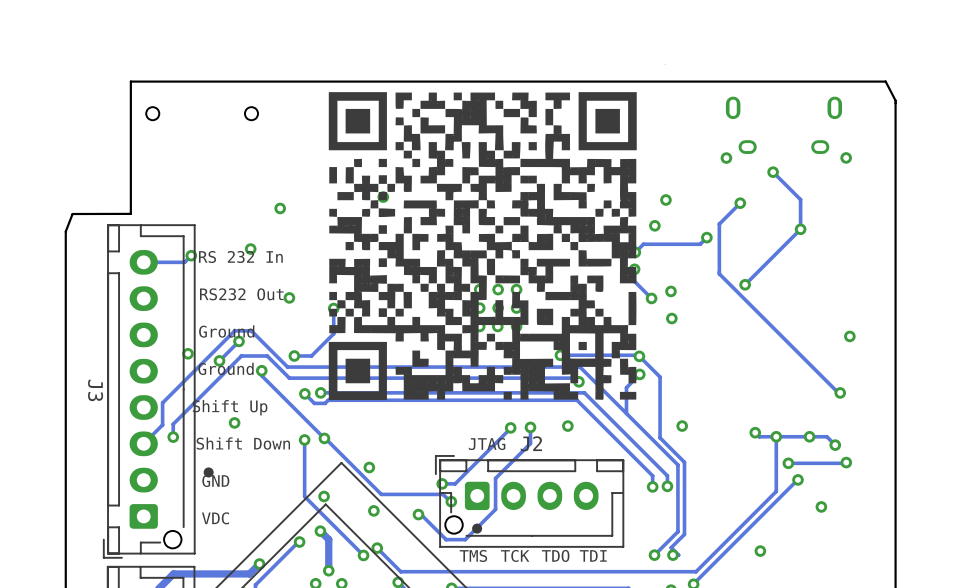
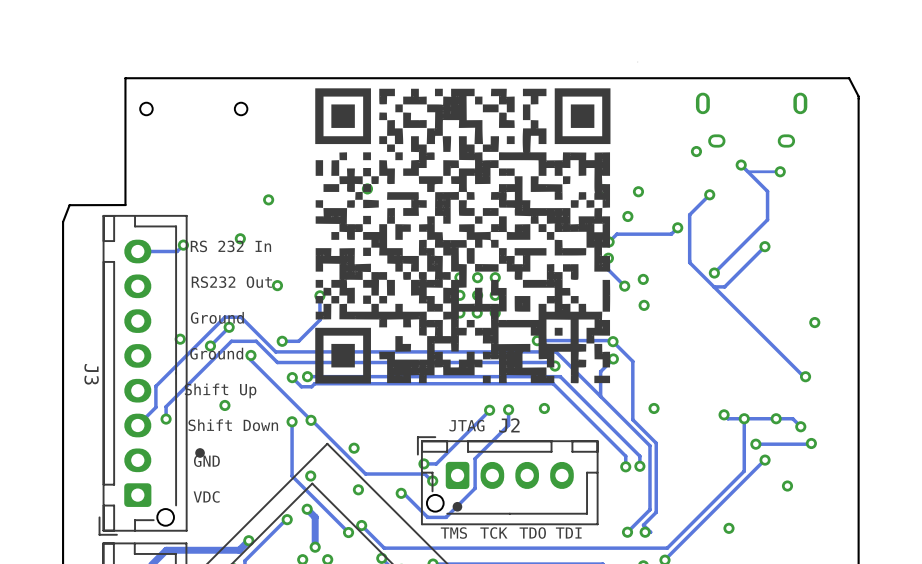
via: (846, 157) -> none
track: none -> (741, 165) (747, 171) (780, 171)
via: none -> (780, 171)
via: (800, 229) -> none
track: none -> (764, 246) (724, 286) (713, 286)
via: none -> (764, 246)

